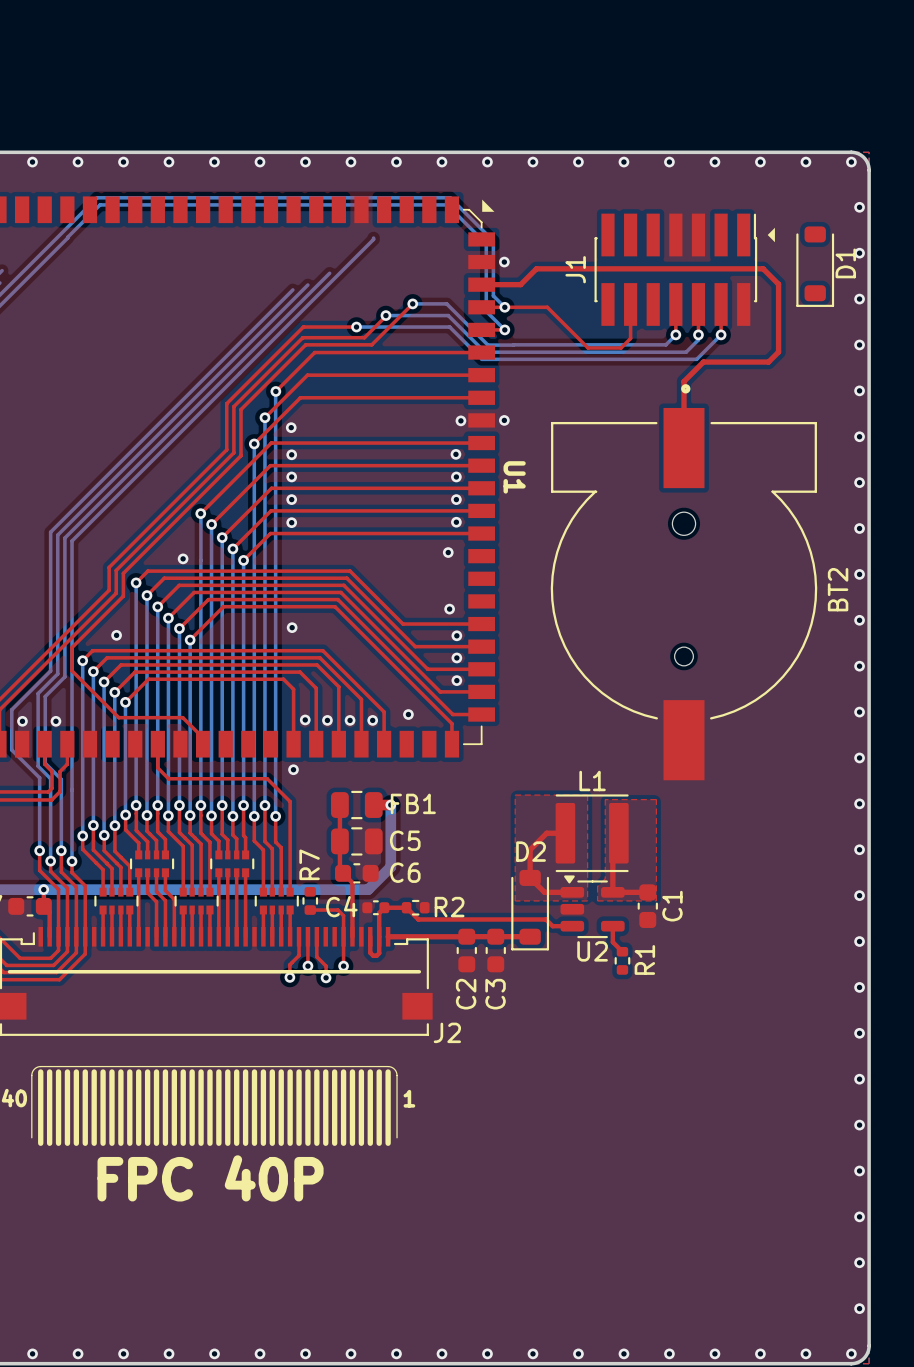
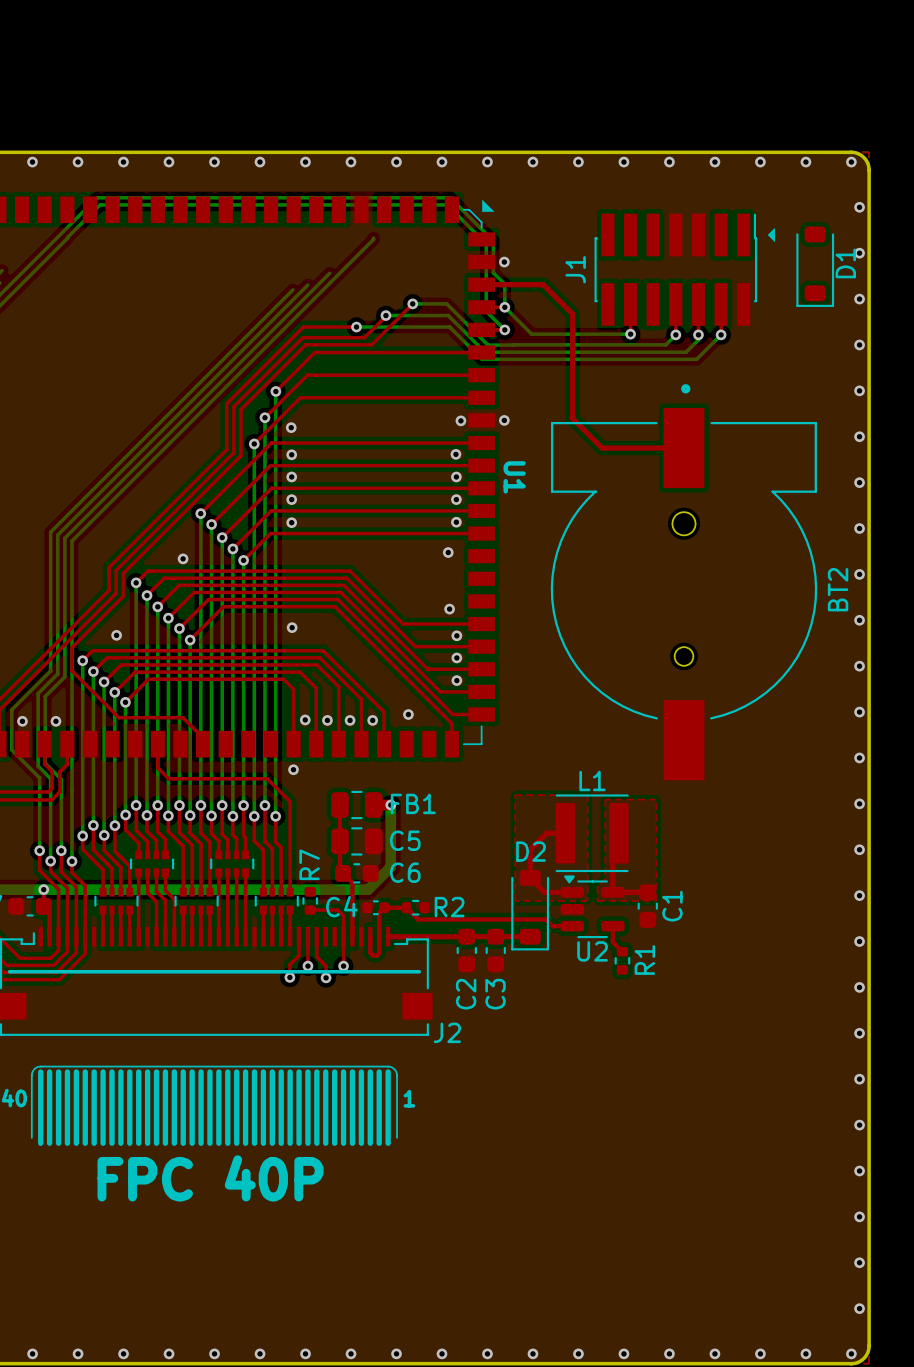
bottom track: (493, 272) (493, 295) (504, 307) -> (493, 272) (504, 284) (504, 307) (531, 334) (630, 334)
top track: (520, 284) (536, 268) (763, 268) (778, 284) (778, 352) (768, 362) (703, 362) (683, 381) (683, 448) -> (520, 284) (543, 284) (572, 314) (572, 418) (602, 448) (683, 448)
top track: (504, 307) (547, 307) (588, 348) (621, 348) (630, 338) (630, 334) -> none
via: none -> (630, 334)

